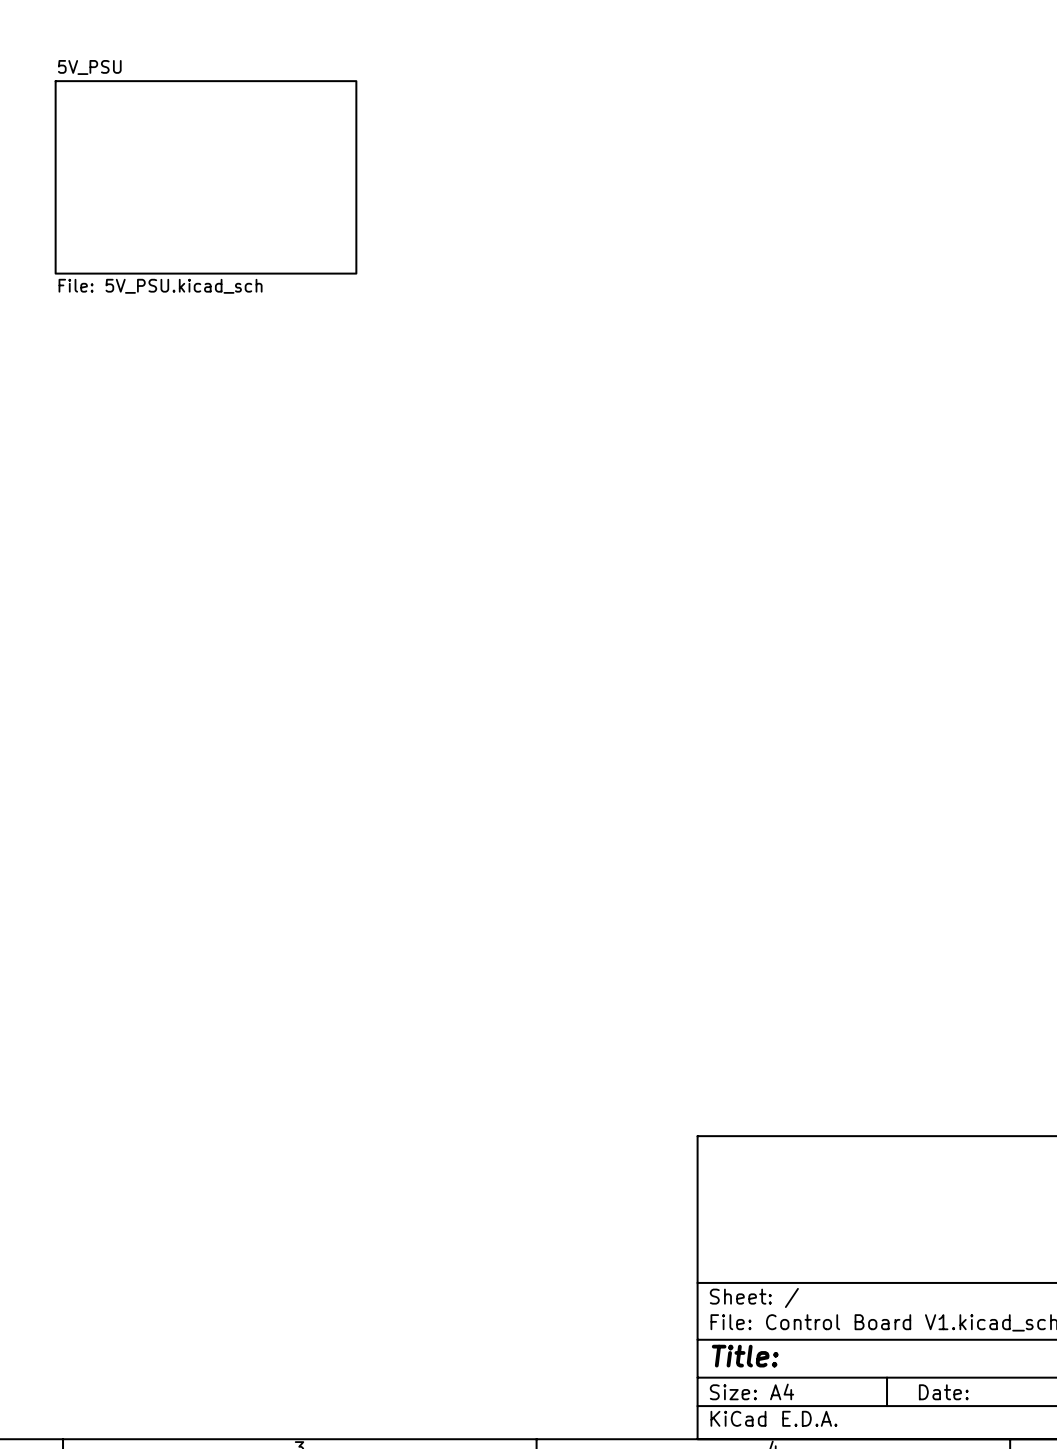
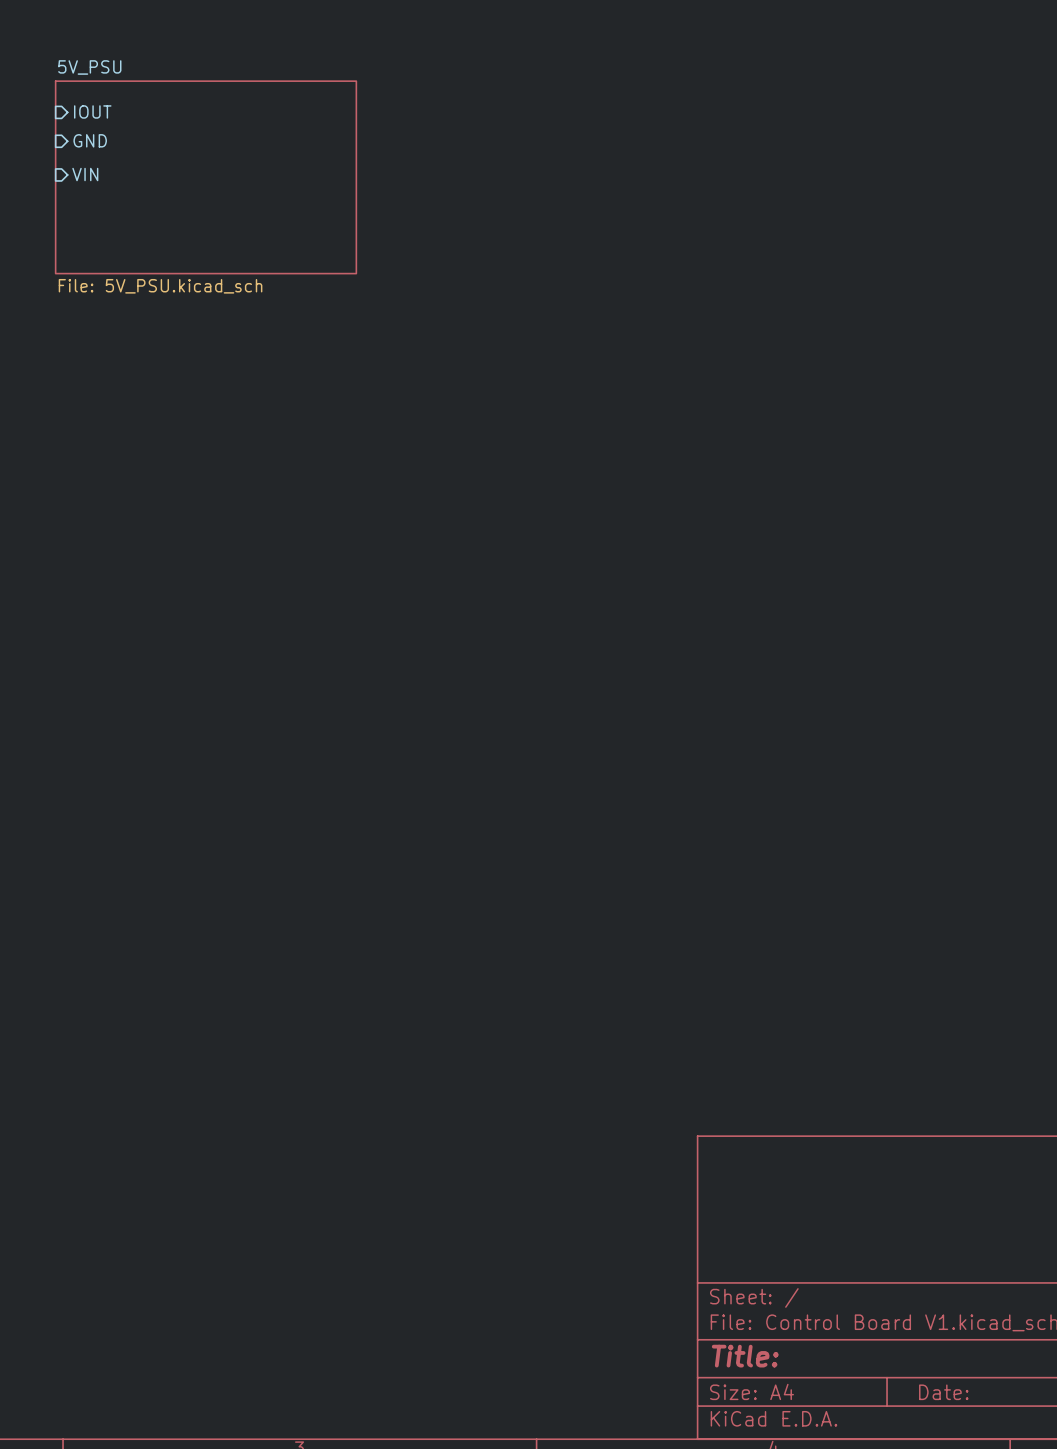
sheet pin: none -> IOUT (92, 111)
sheet pin: none -> GND (90, 140)
sheet pin: none -> VIN (85, 174)

